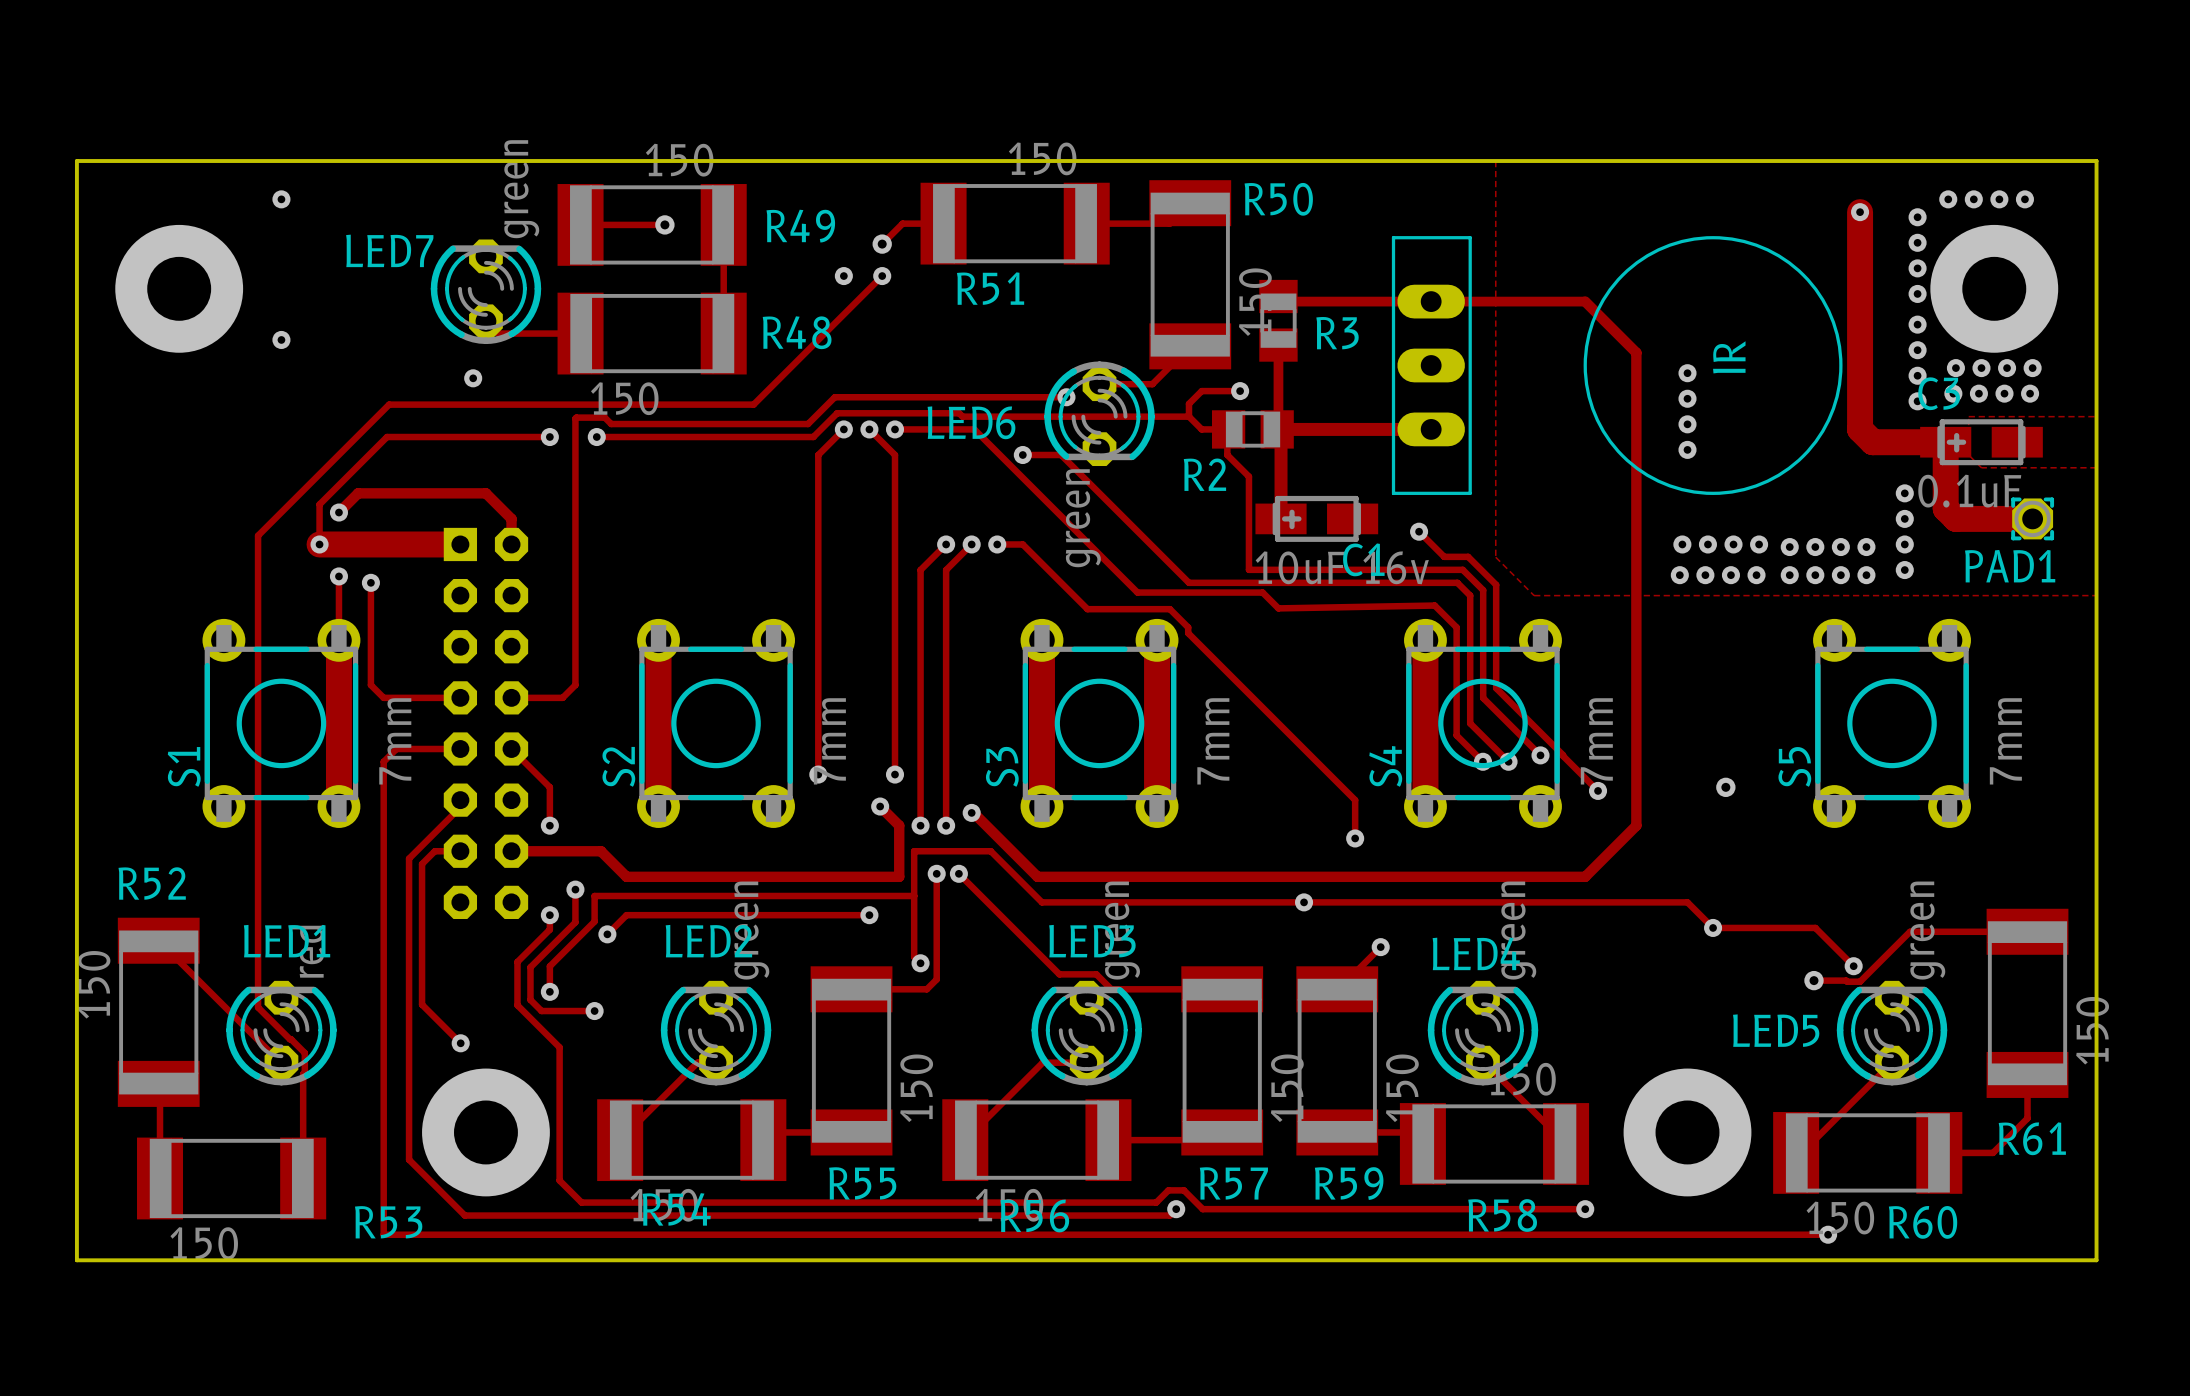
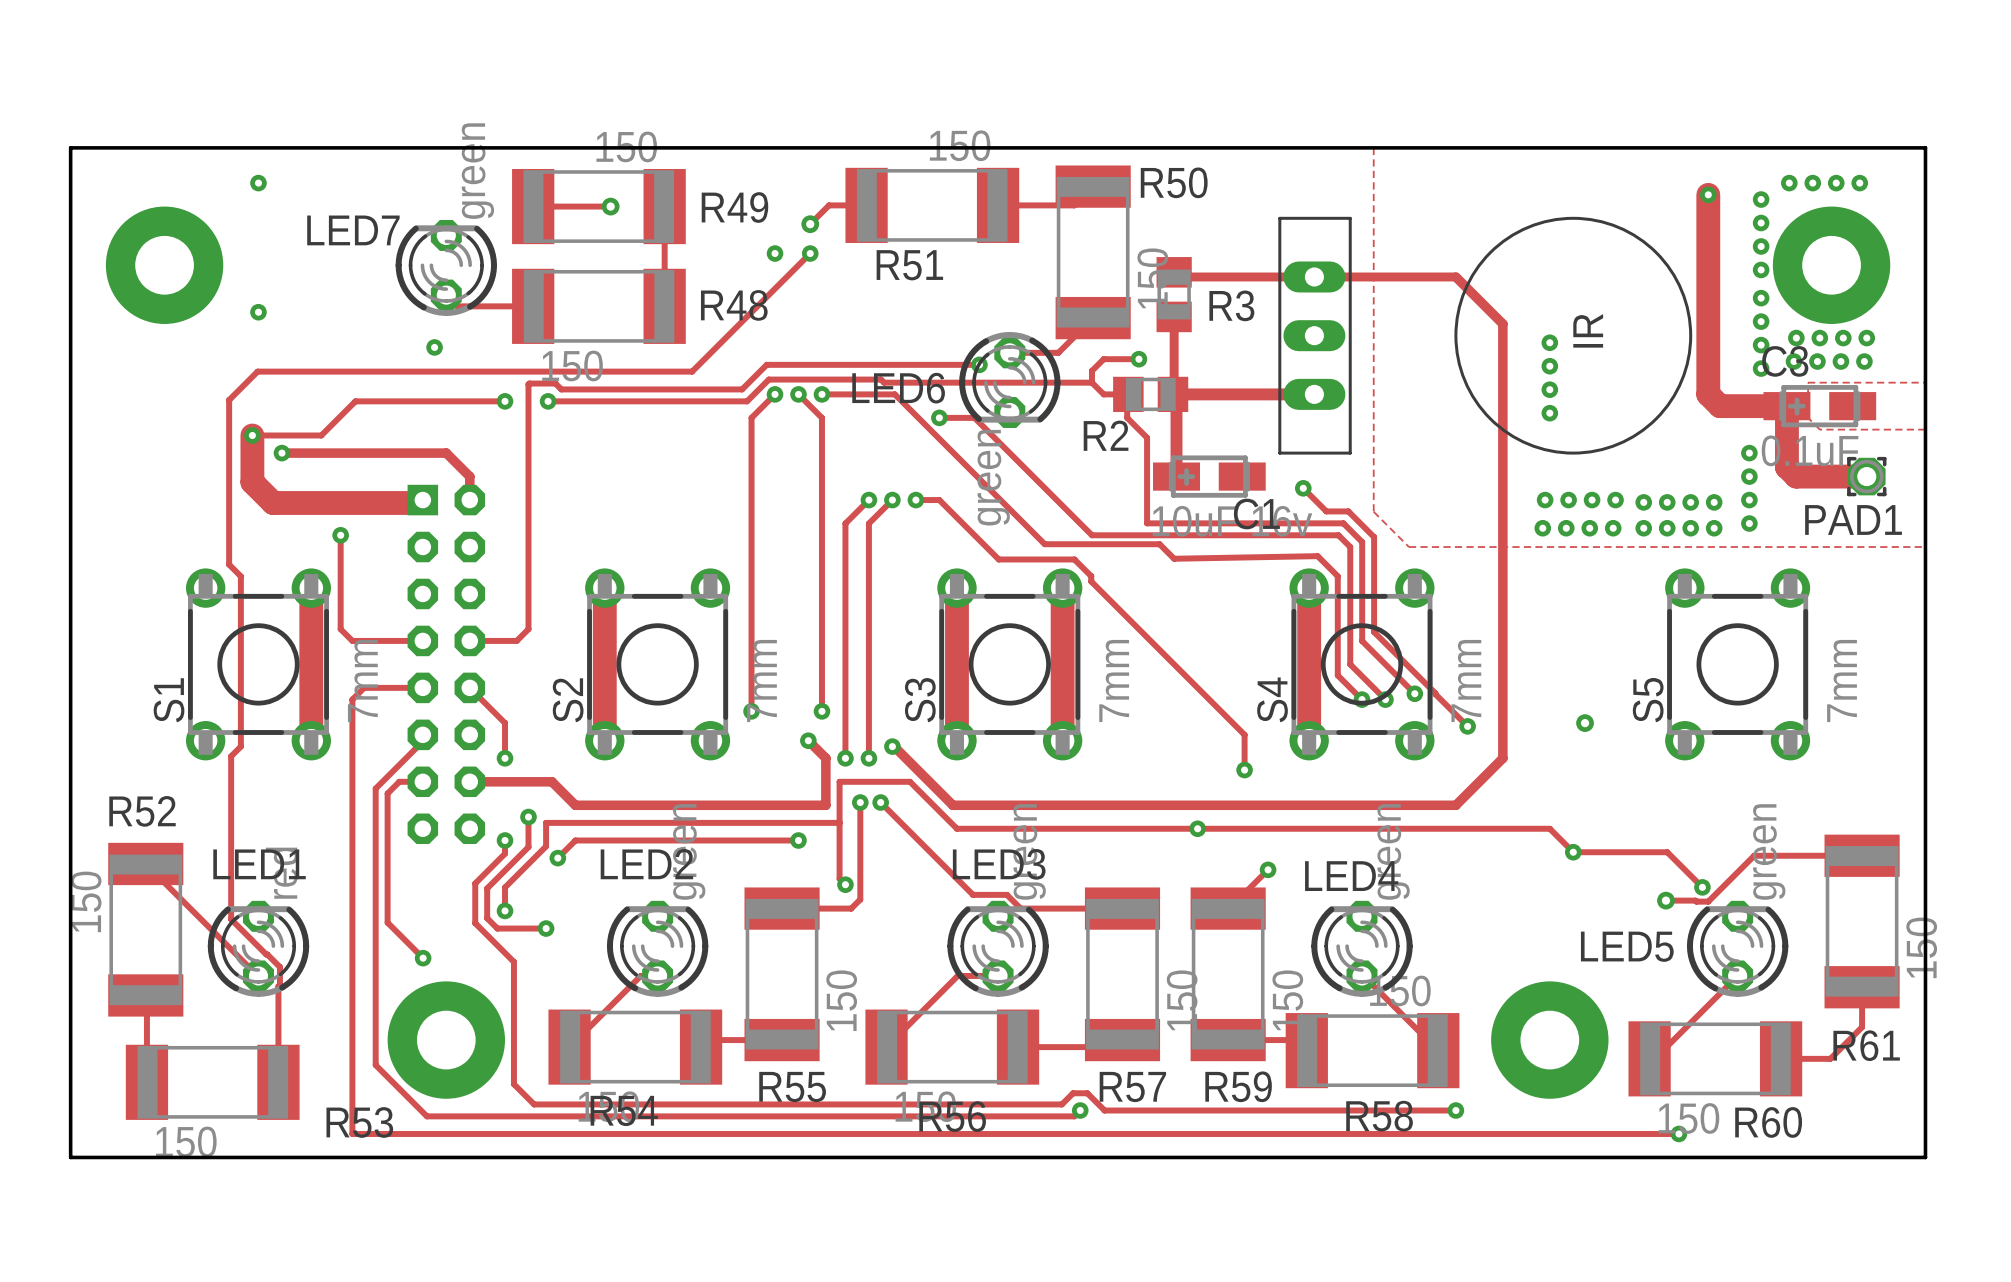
track: (389, 404) (258, 535) (258, 1007) -> (357, 371) (257, 371) (229, 400) (229, 564) (240, 576) (240, 746) (231, 756) (231, 919) (237, 925)
via: none -> (252, 435)
track: (349, 474) (319, 504) (319, 544) (460, 544) -> (321, 435) (252, 435) (252, 482) (273, 502) (419, 502) (422, 500)
via: none -> (281, 453)
track: (358, 493) (338, 512) -> (328, 453) (281, 453)
via: (338, 512) -> none
via: (319, 544) -> none
track: (338, 576) (338, 640) -> none
via: (338, 576) -> none

